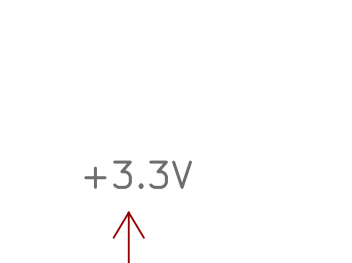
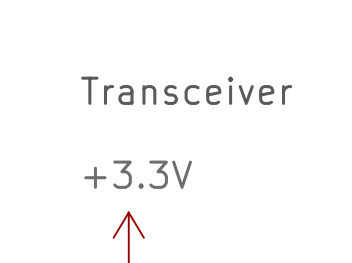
text: none -> Transceiver (186, 90)

